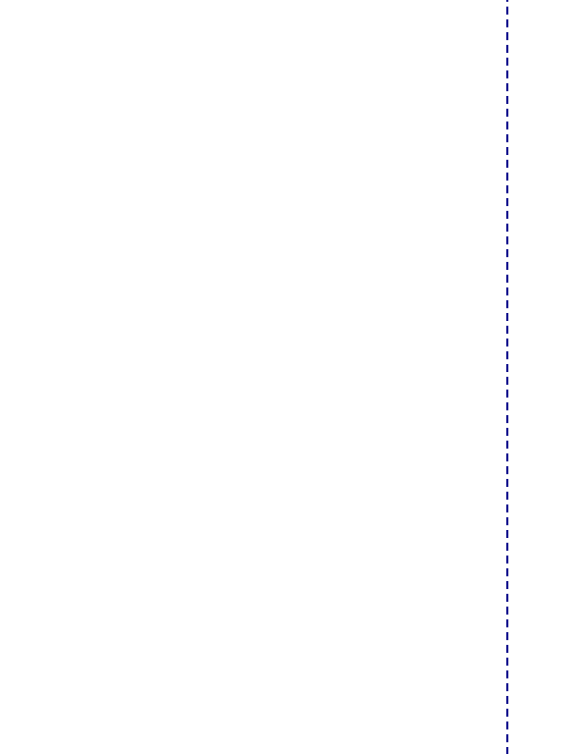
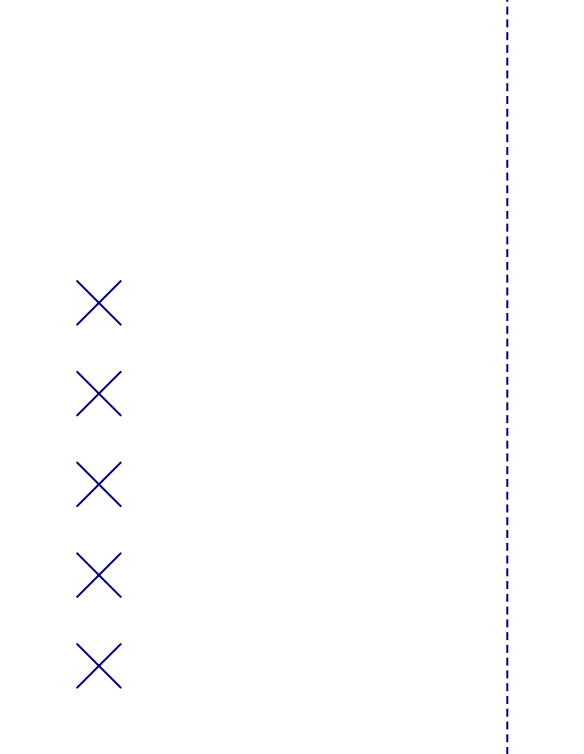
no-connect mark: none -> (98, 302)
no-connect mark: none -> (98, 393)
no-connect mark: none -> (98, 484)
no-connect mark: none -> (98, 575)
no-connect mark: none -> (98, 665)

